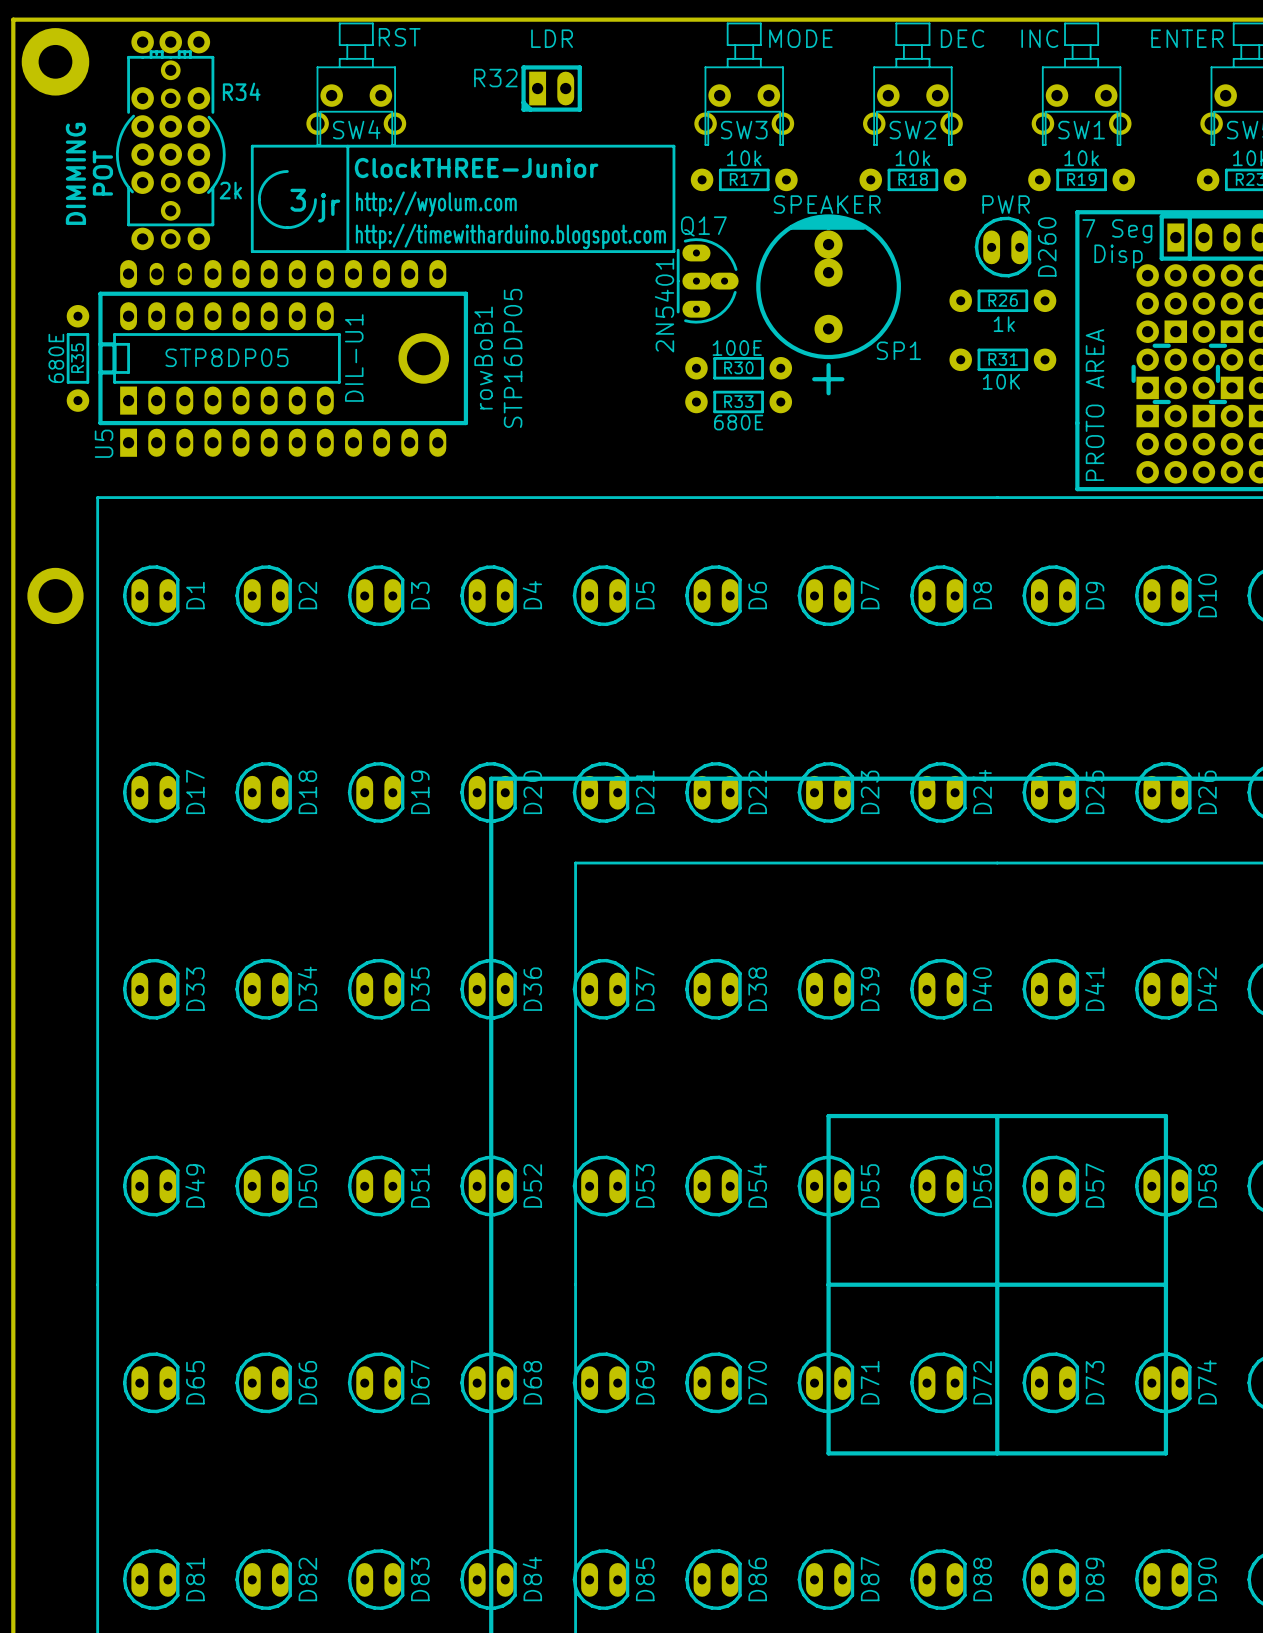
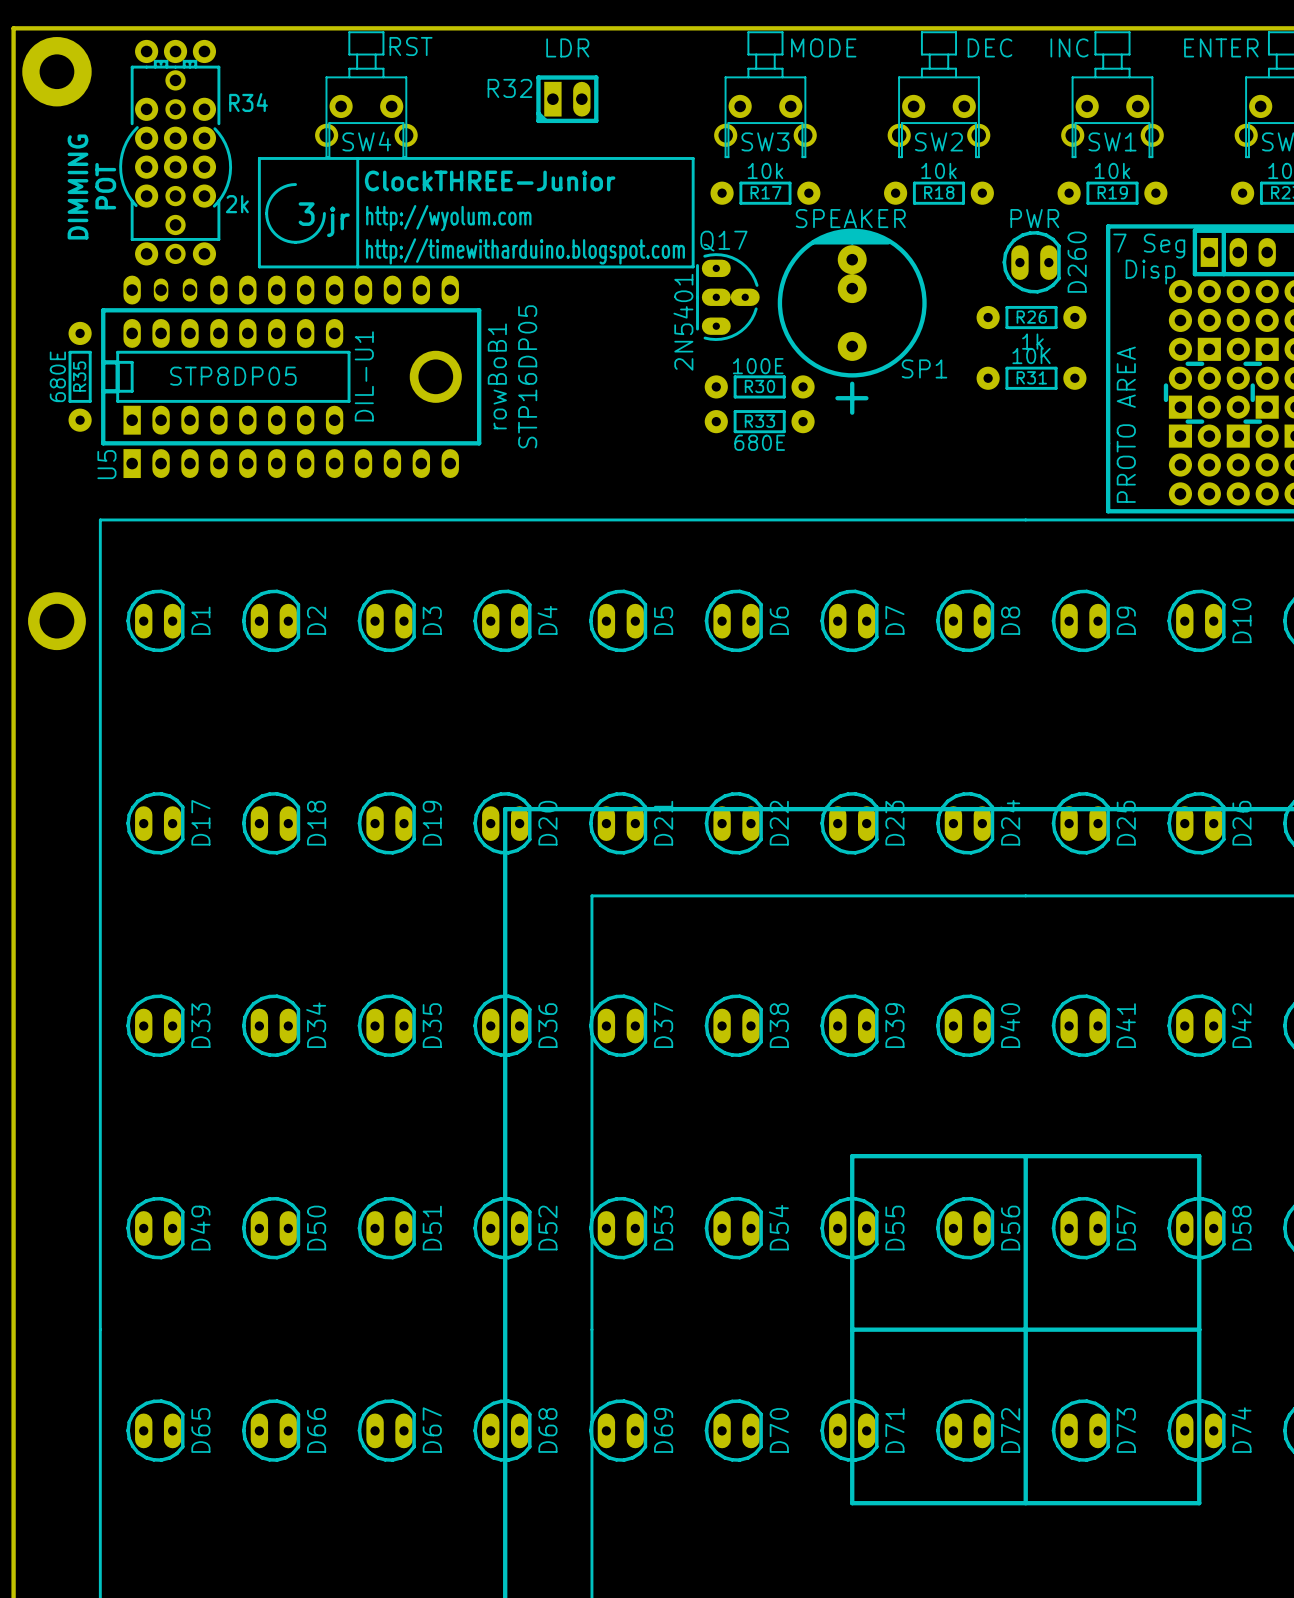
R31 value position: 10K (1001, 381) -> 10K (1031, 356)

